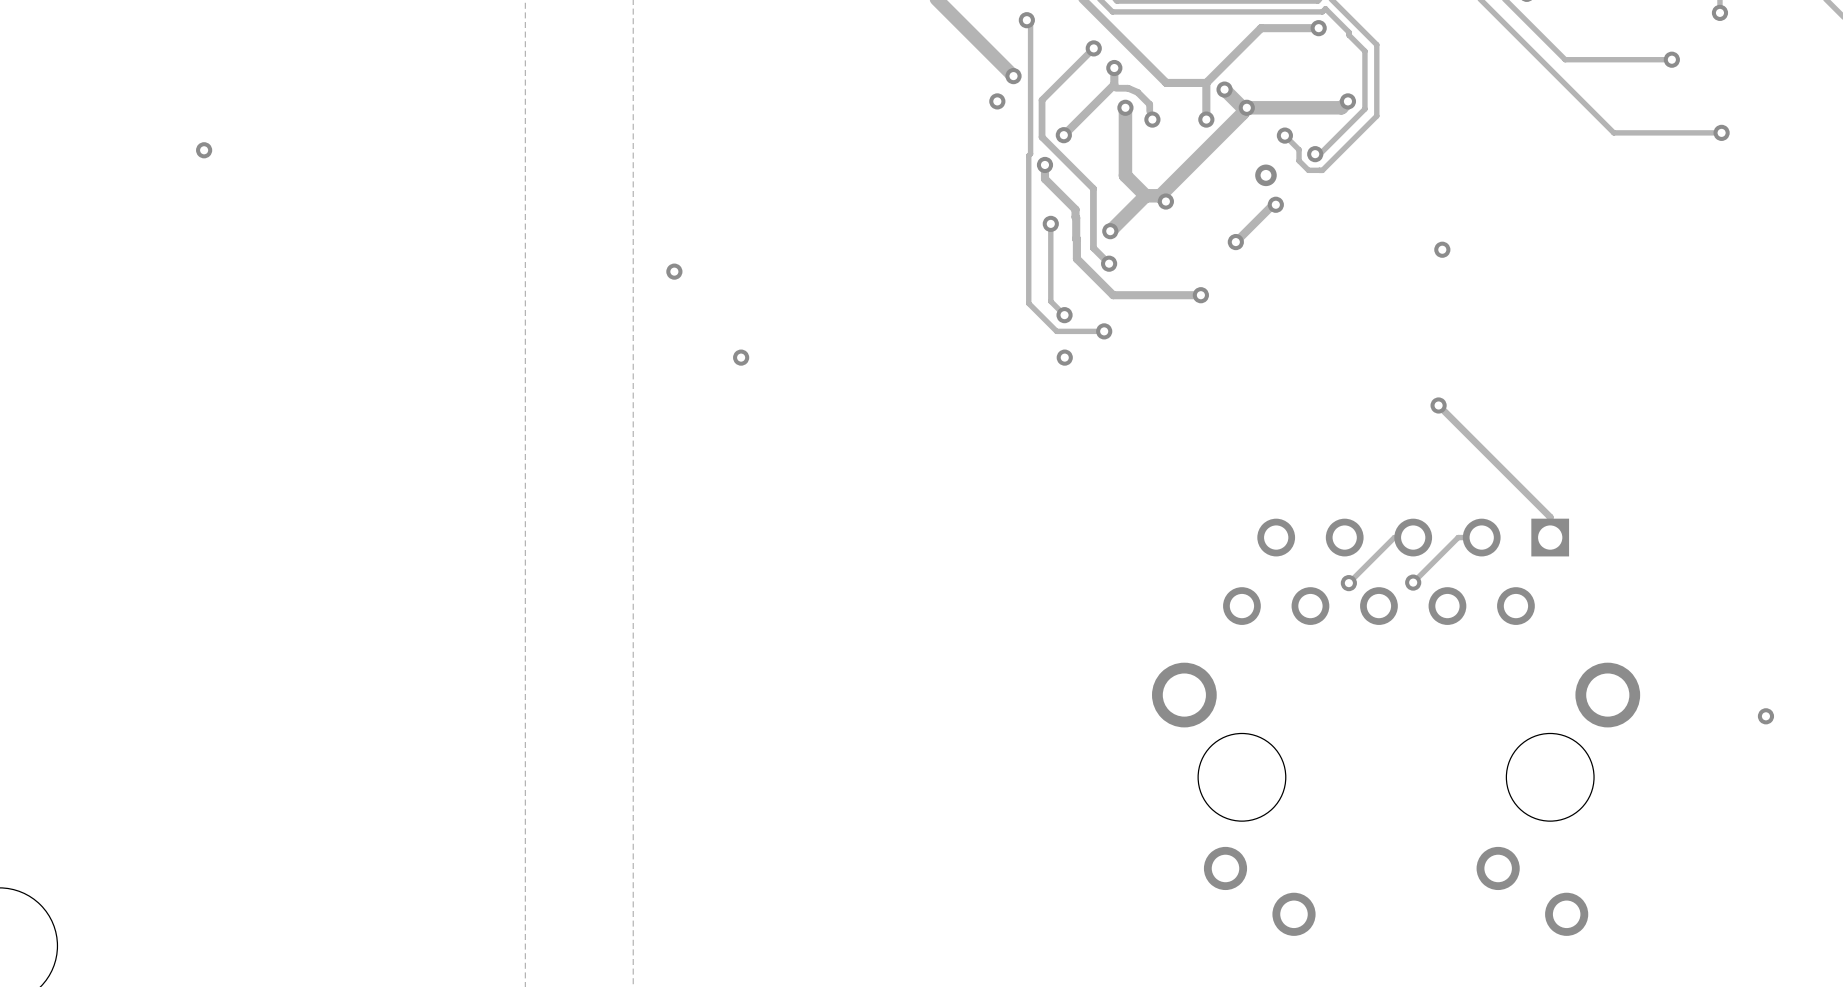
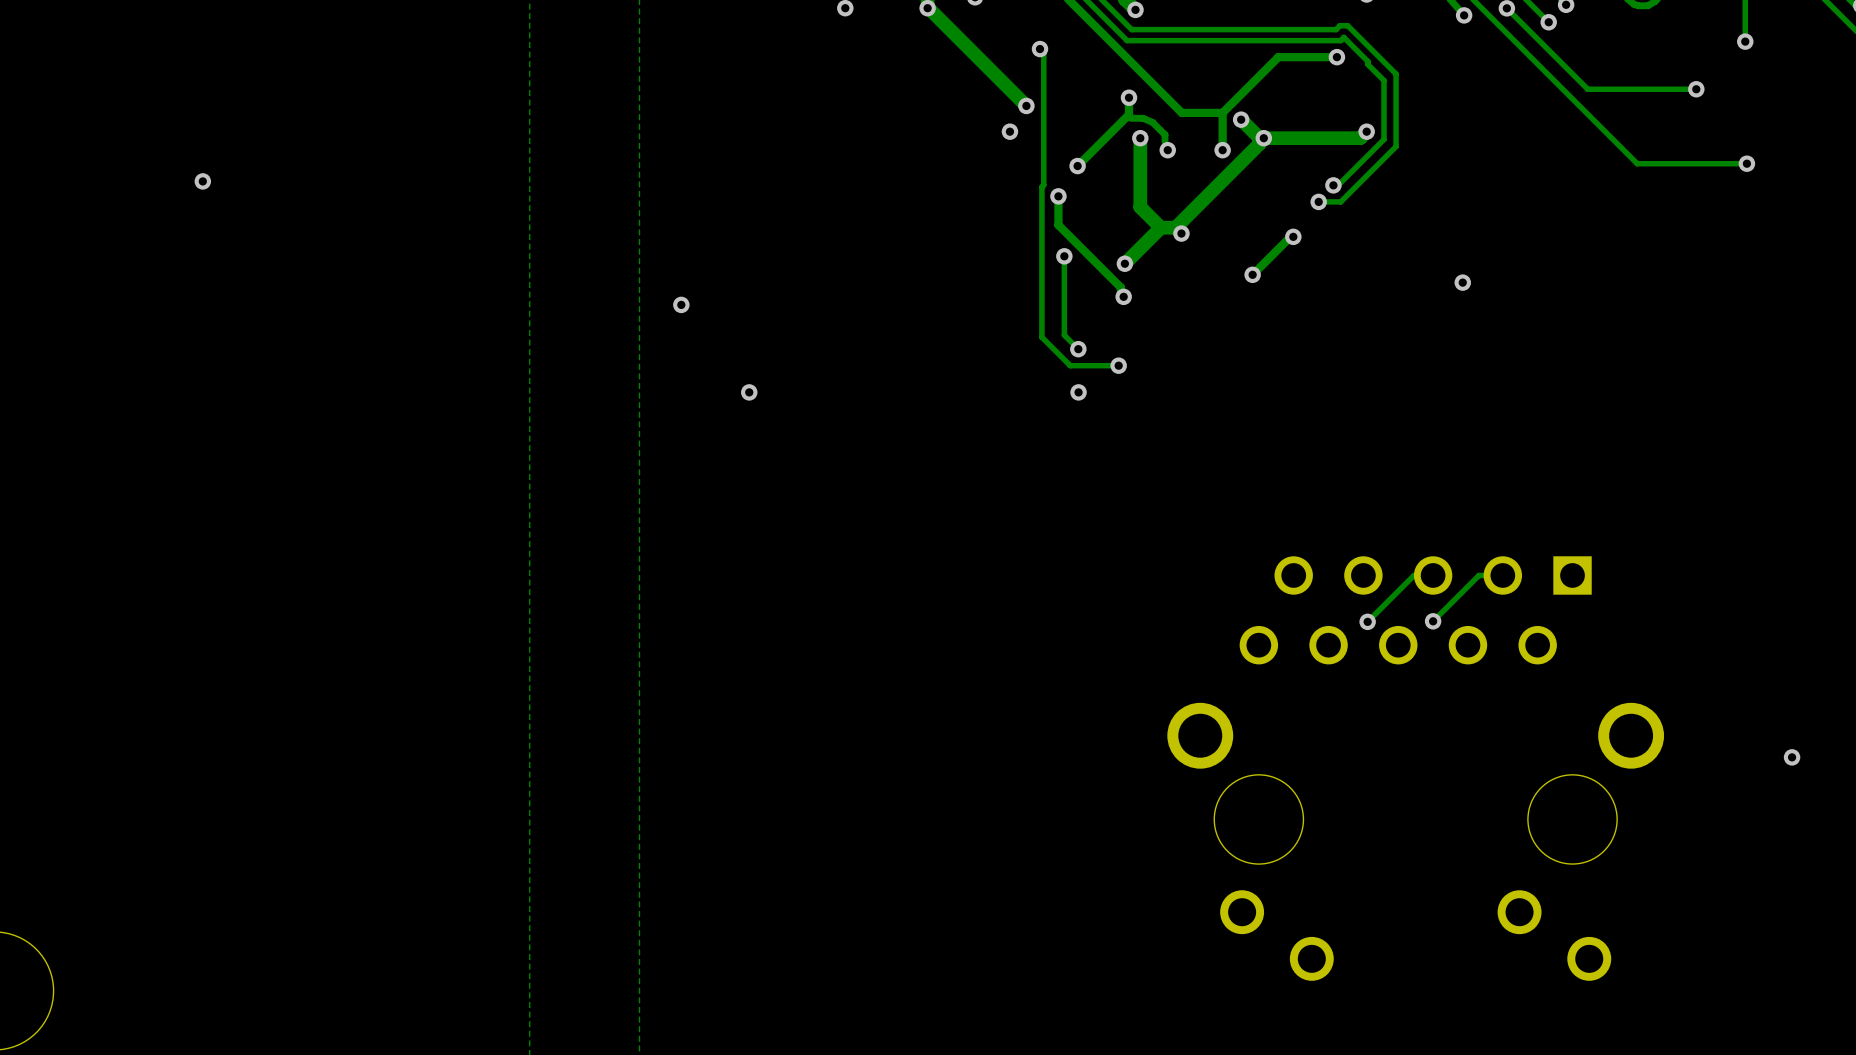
track: (1093, 48) (1042, 100) (1042, 137) (1093, 188) (1093, 248) (1109, 263) -> none
via: (1093, 48) -> none
track: (1284, 135) (1299, 149) (1299, 160) (1308, 170) (1319, 170) -> (1318, 201) (1337, 201)
via position: (1284, 135) -> (1318, 201)
via: (1265, 175) -> none
track: (1044, 179) (1075, 209) (1076, 239) -> (1058, 210) (1058, 225) (1120, 287) (1120, 297)
track: (1076, 239) (1076, 258) (1113, 295) (1200, 295) -> none
via: (1200, 295) -> none
track: (1438, 405) (1550, 517) (1550, 537) -> none
via: (1438, 405) -> none

